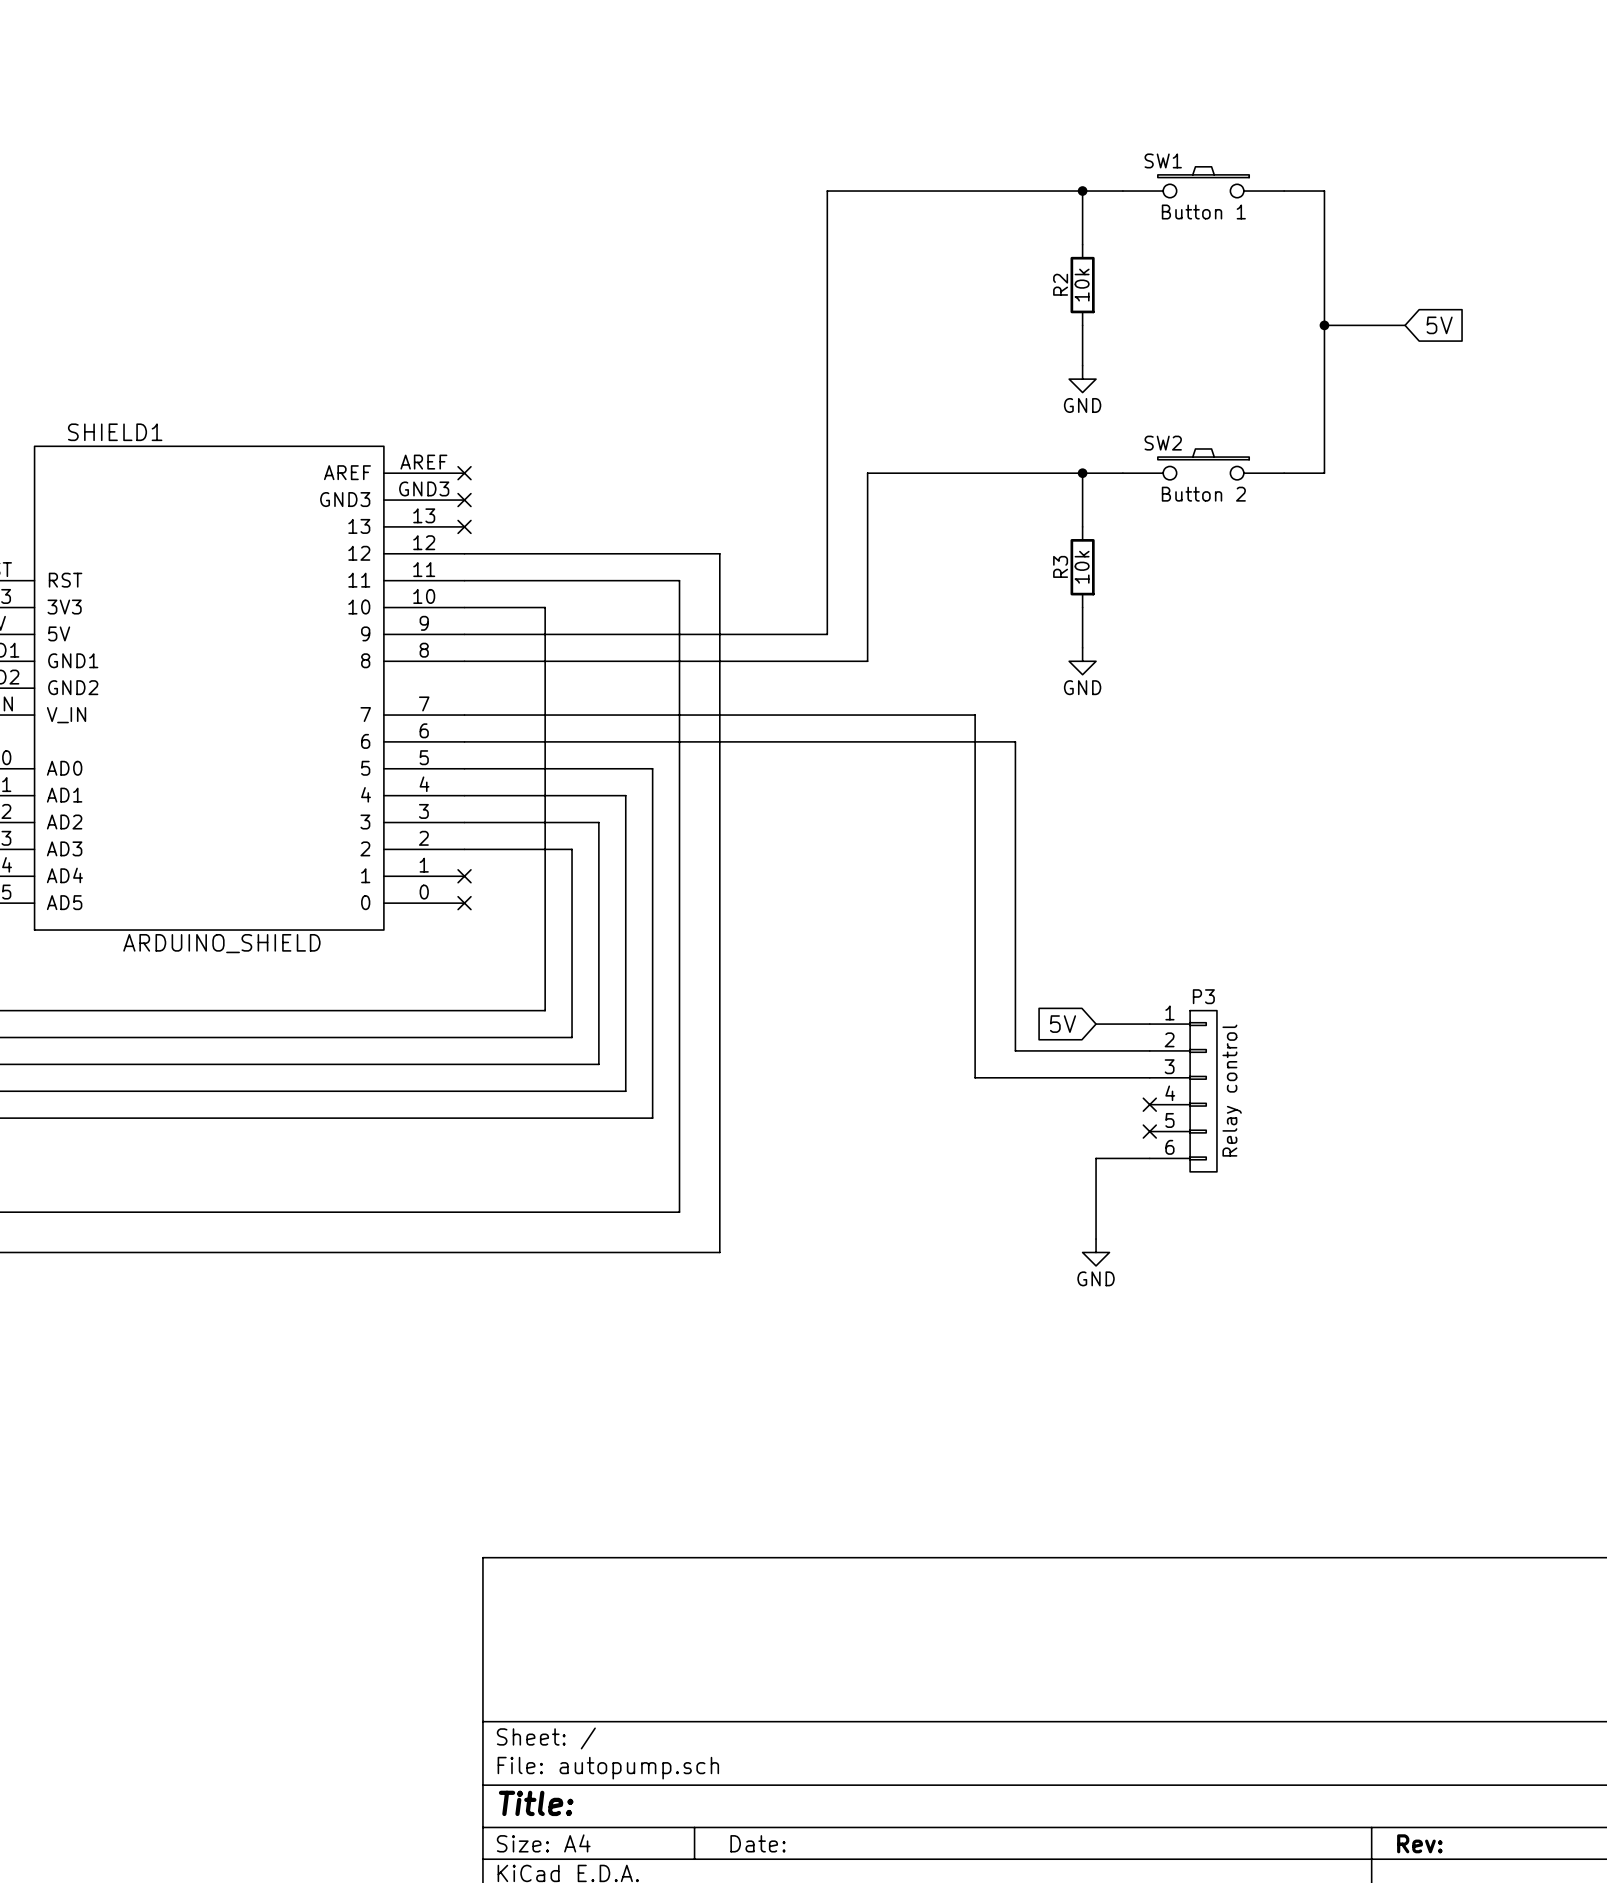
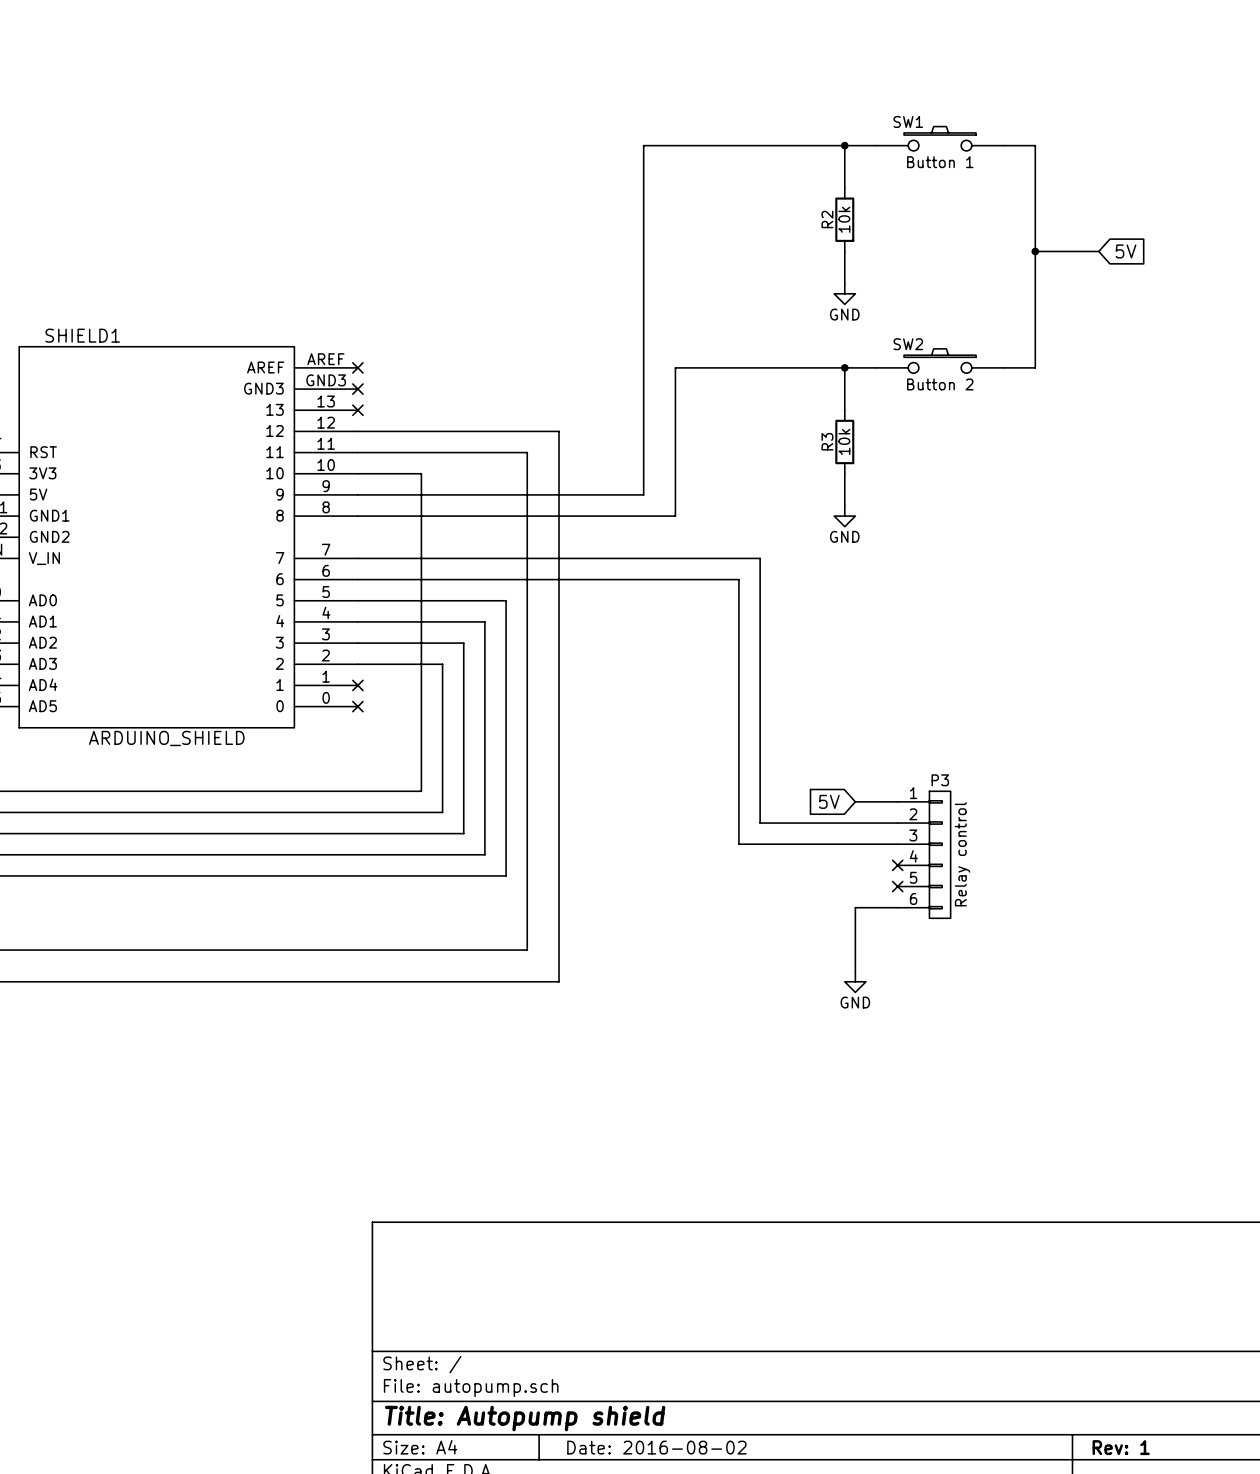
wire: (948, 741) (1015, 741) (1015, 1050) -> (738, 579) (738, 844) (760, 844)
wire: (975, 1050) (975, 1077) -> (760, 823) (791, 823)
title block: Title: (536, 1803) -> Title: Autopump shield (525, 1418)
title block: Date: (757, 1843) -> Date: 2016-08-02 (656, 1447)
title block: Rev: (1419, 1843) -> Rev: 1 (1121, 1447)

